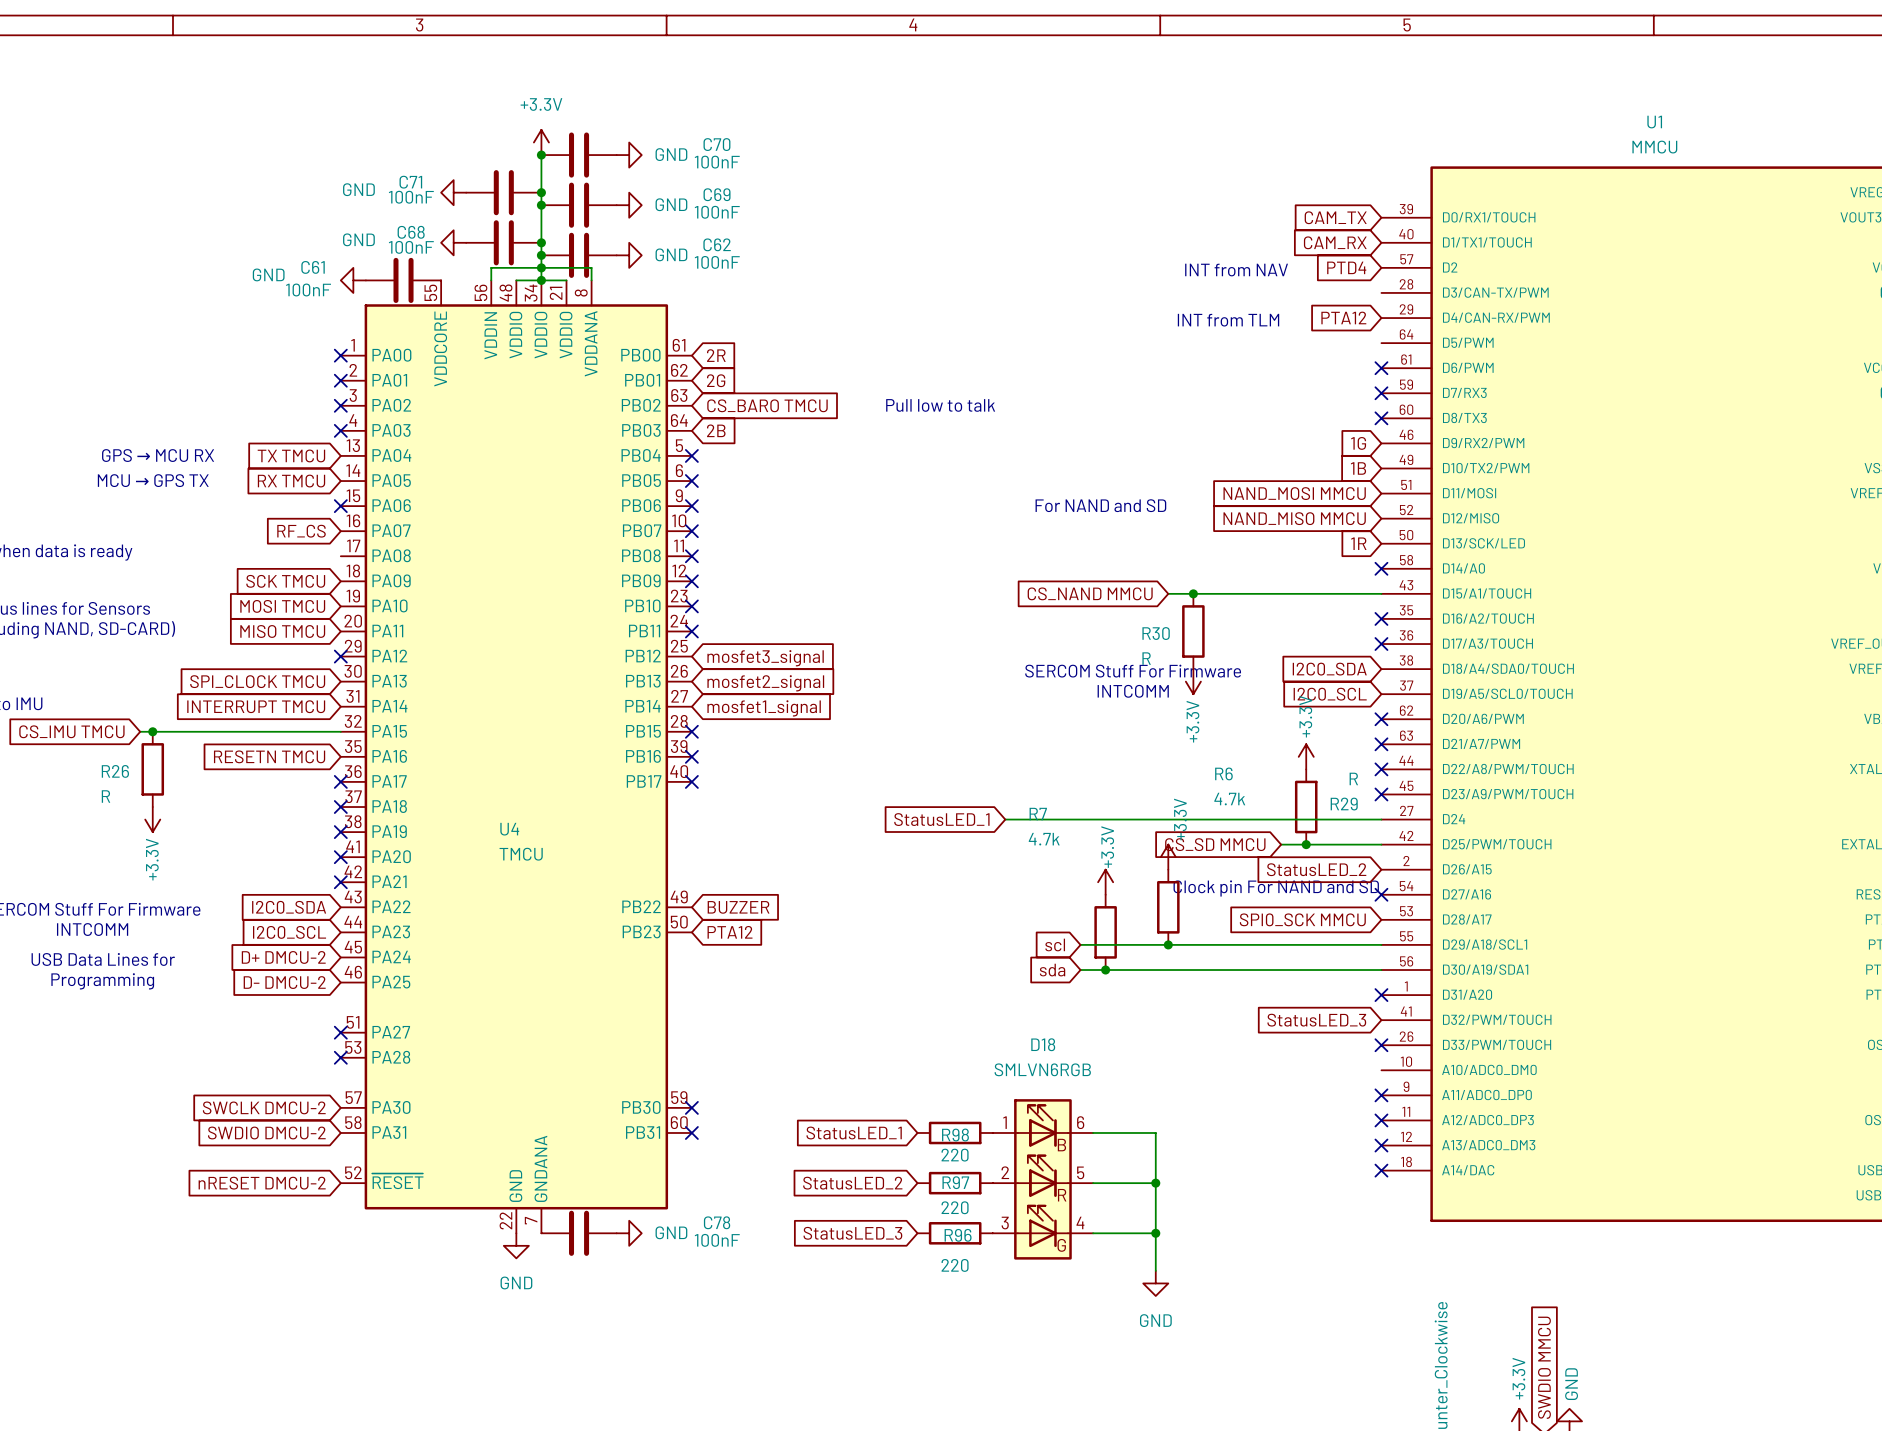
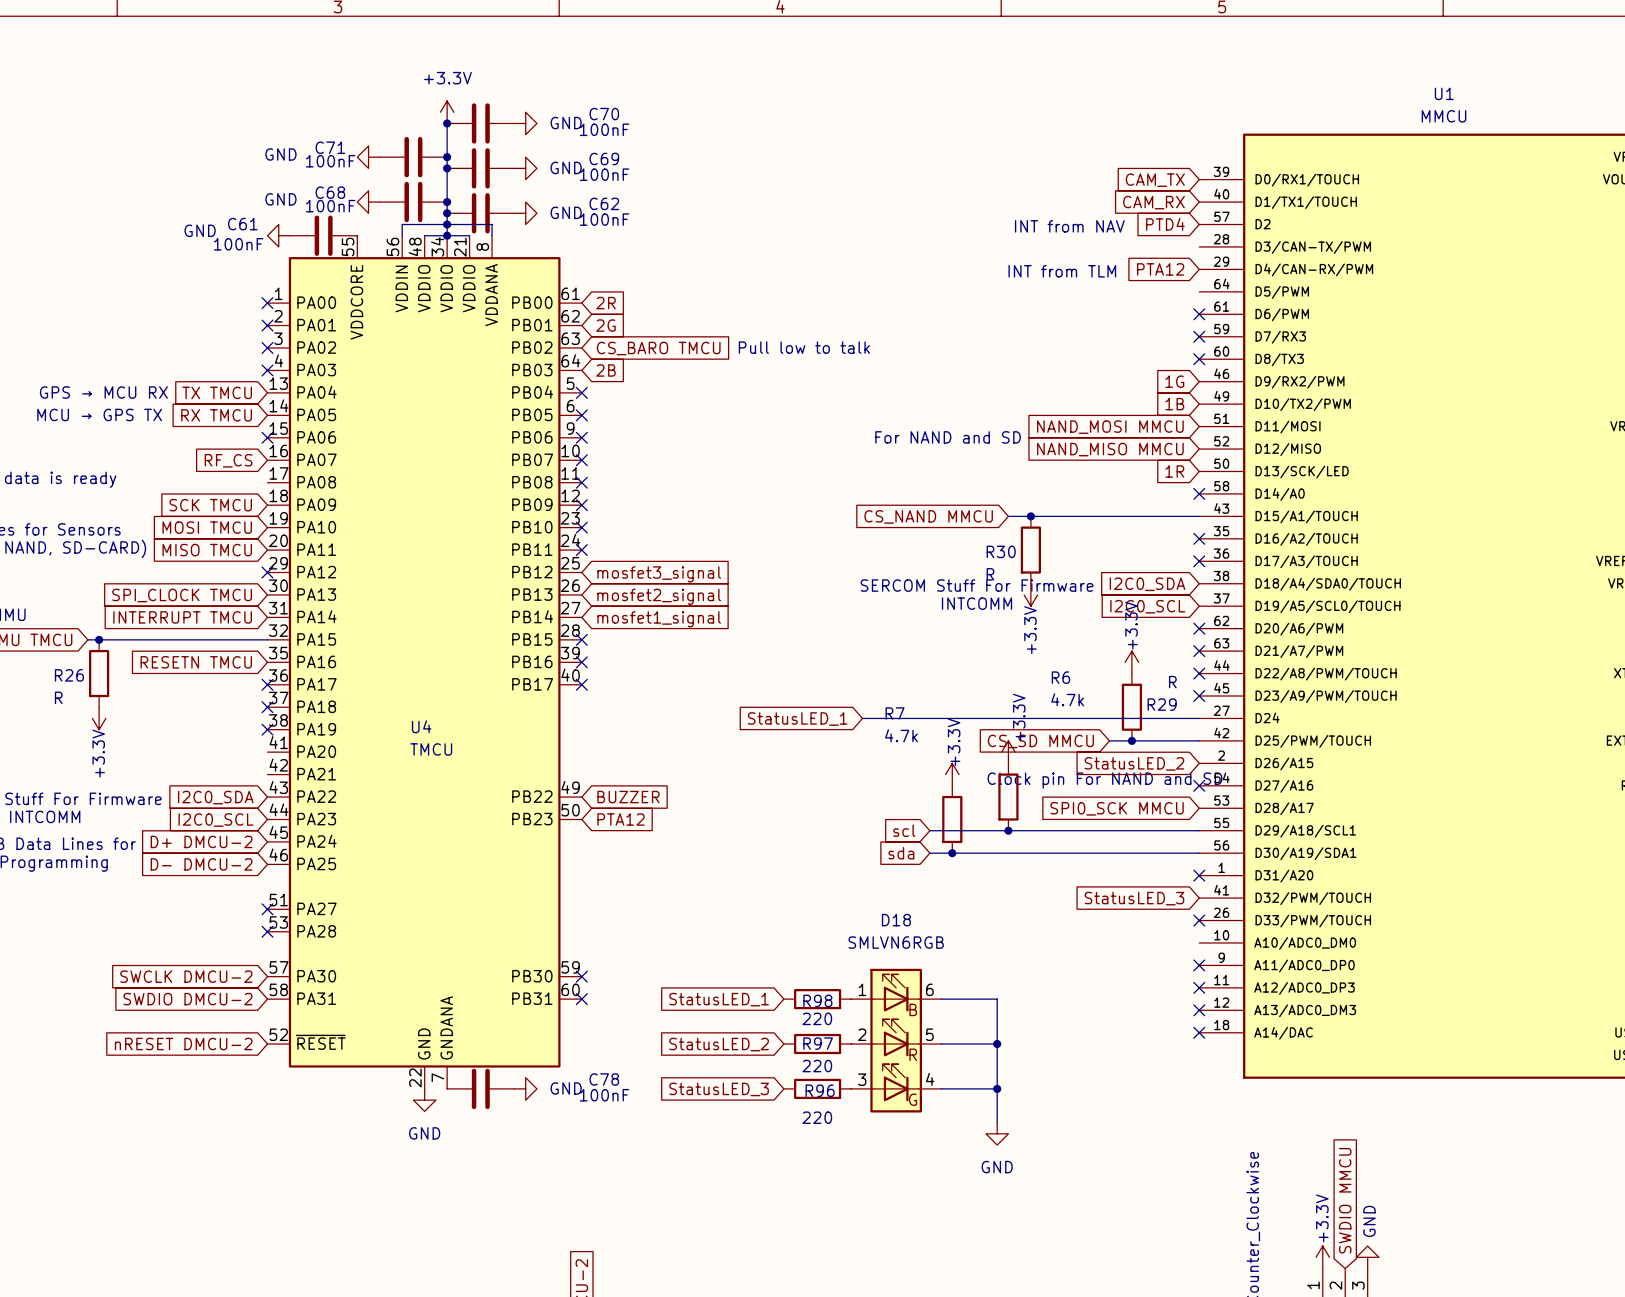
no-connect mark: (340, 857) -> none
no-connect mark: (340, 882) -> none

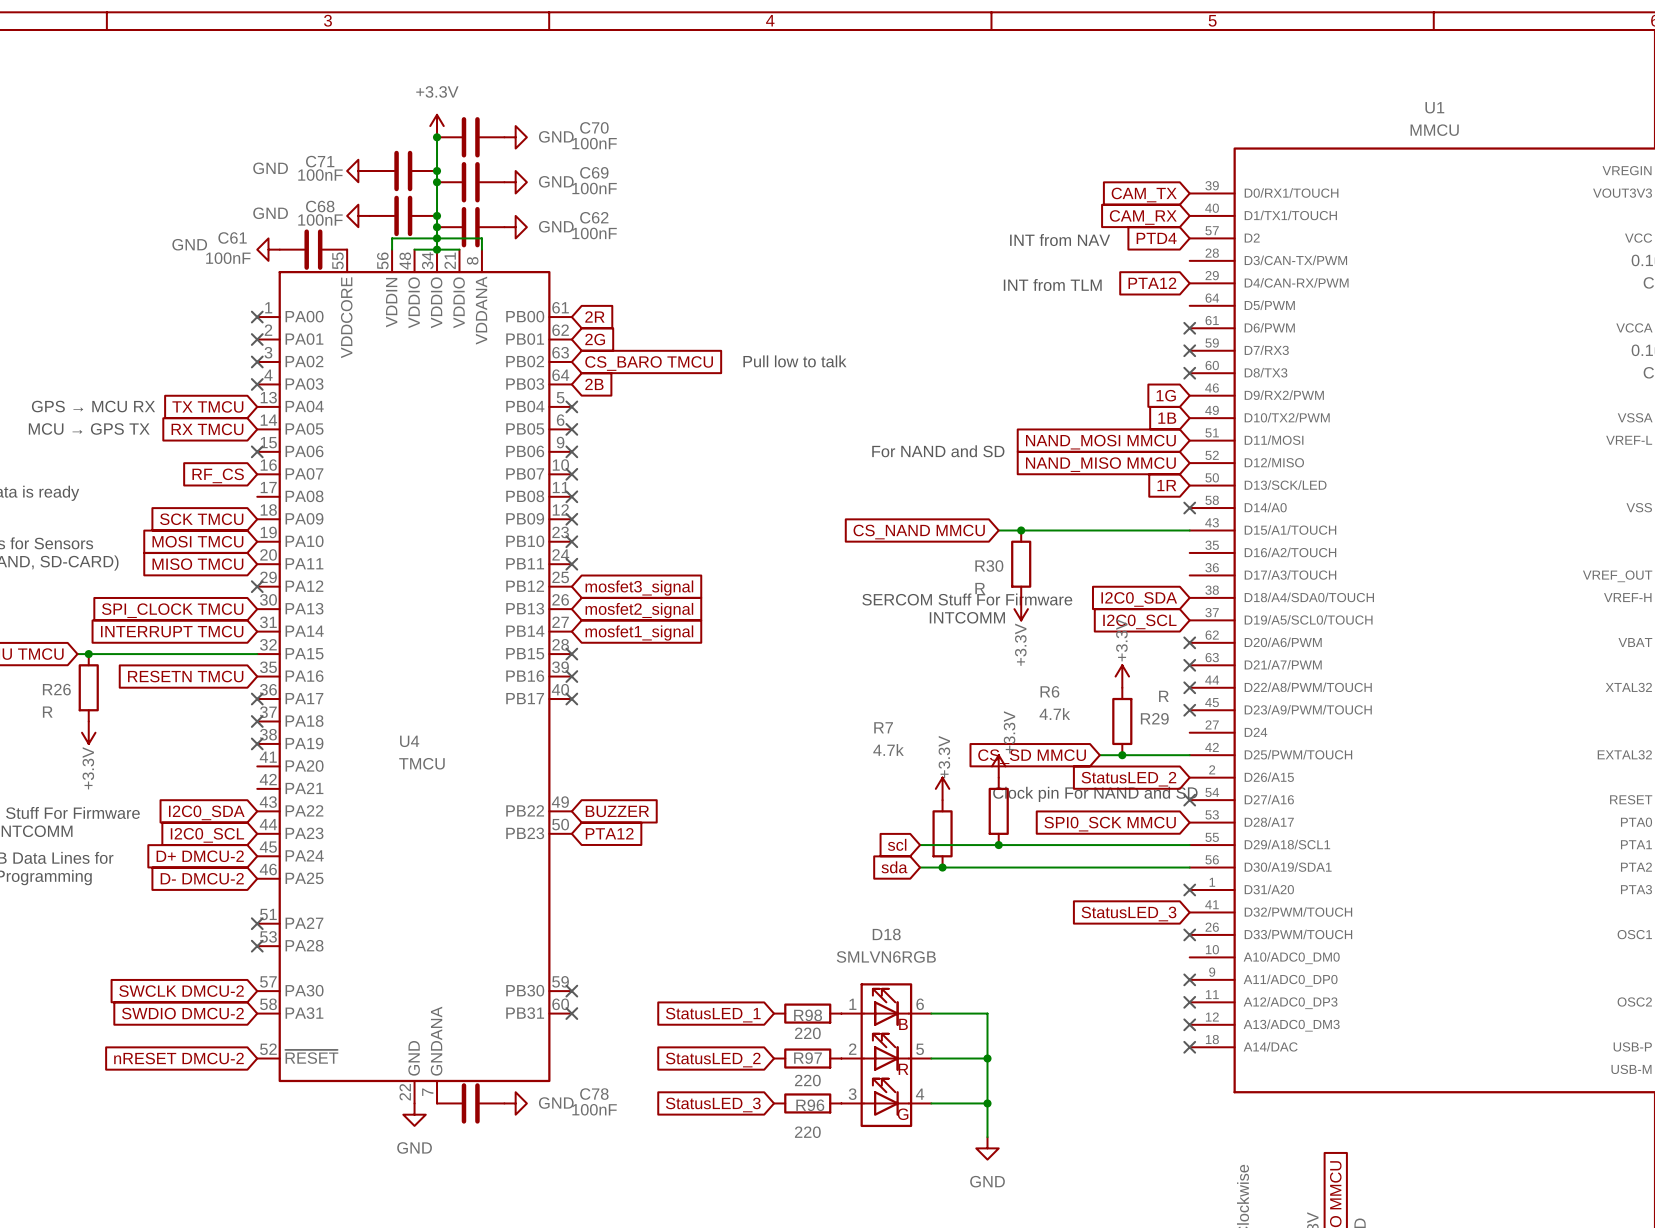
no-connect mark: (1199, 538) -> none
no-connect mark: (1199, 561) -> none
global label: StatusLED_1 (797, 718) -> none
wire: (862, 718) (1199, 718) -> none

